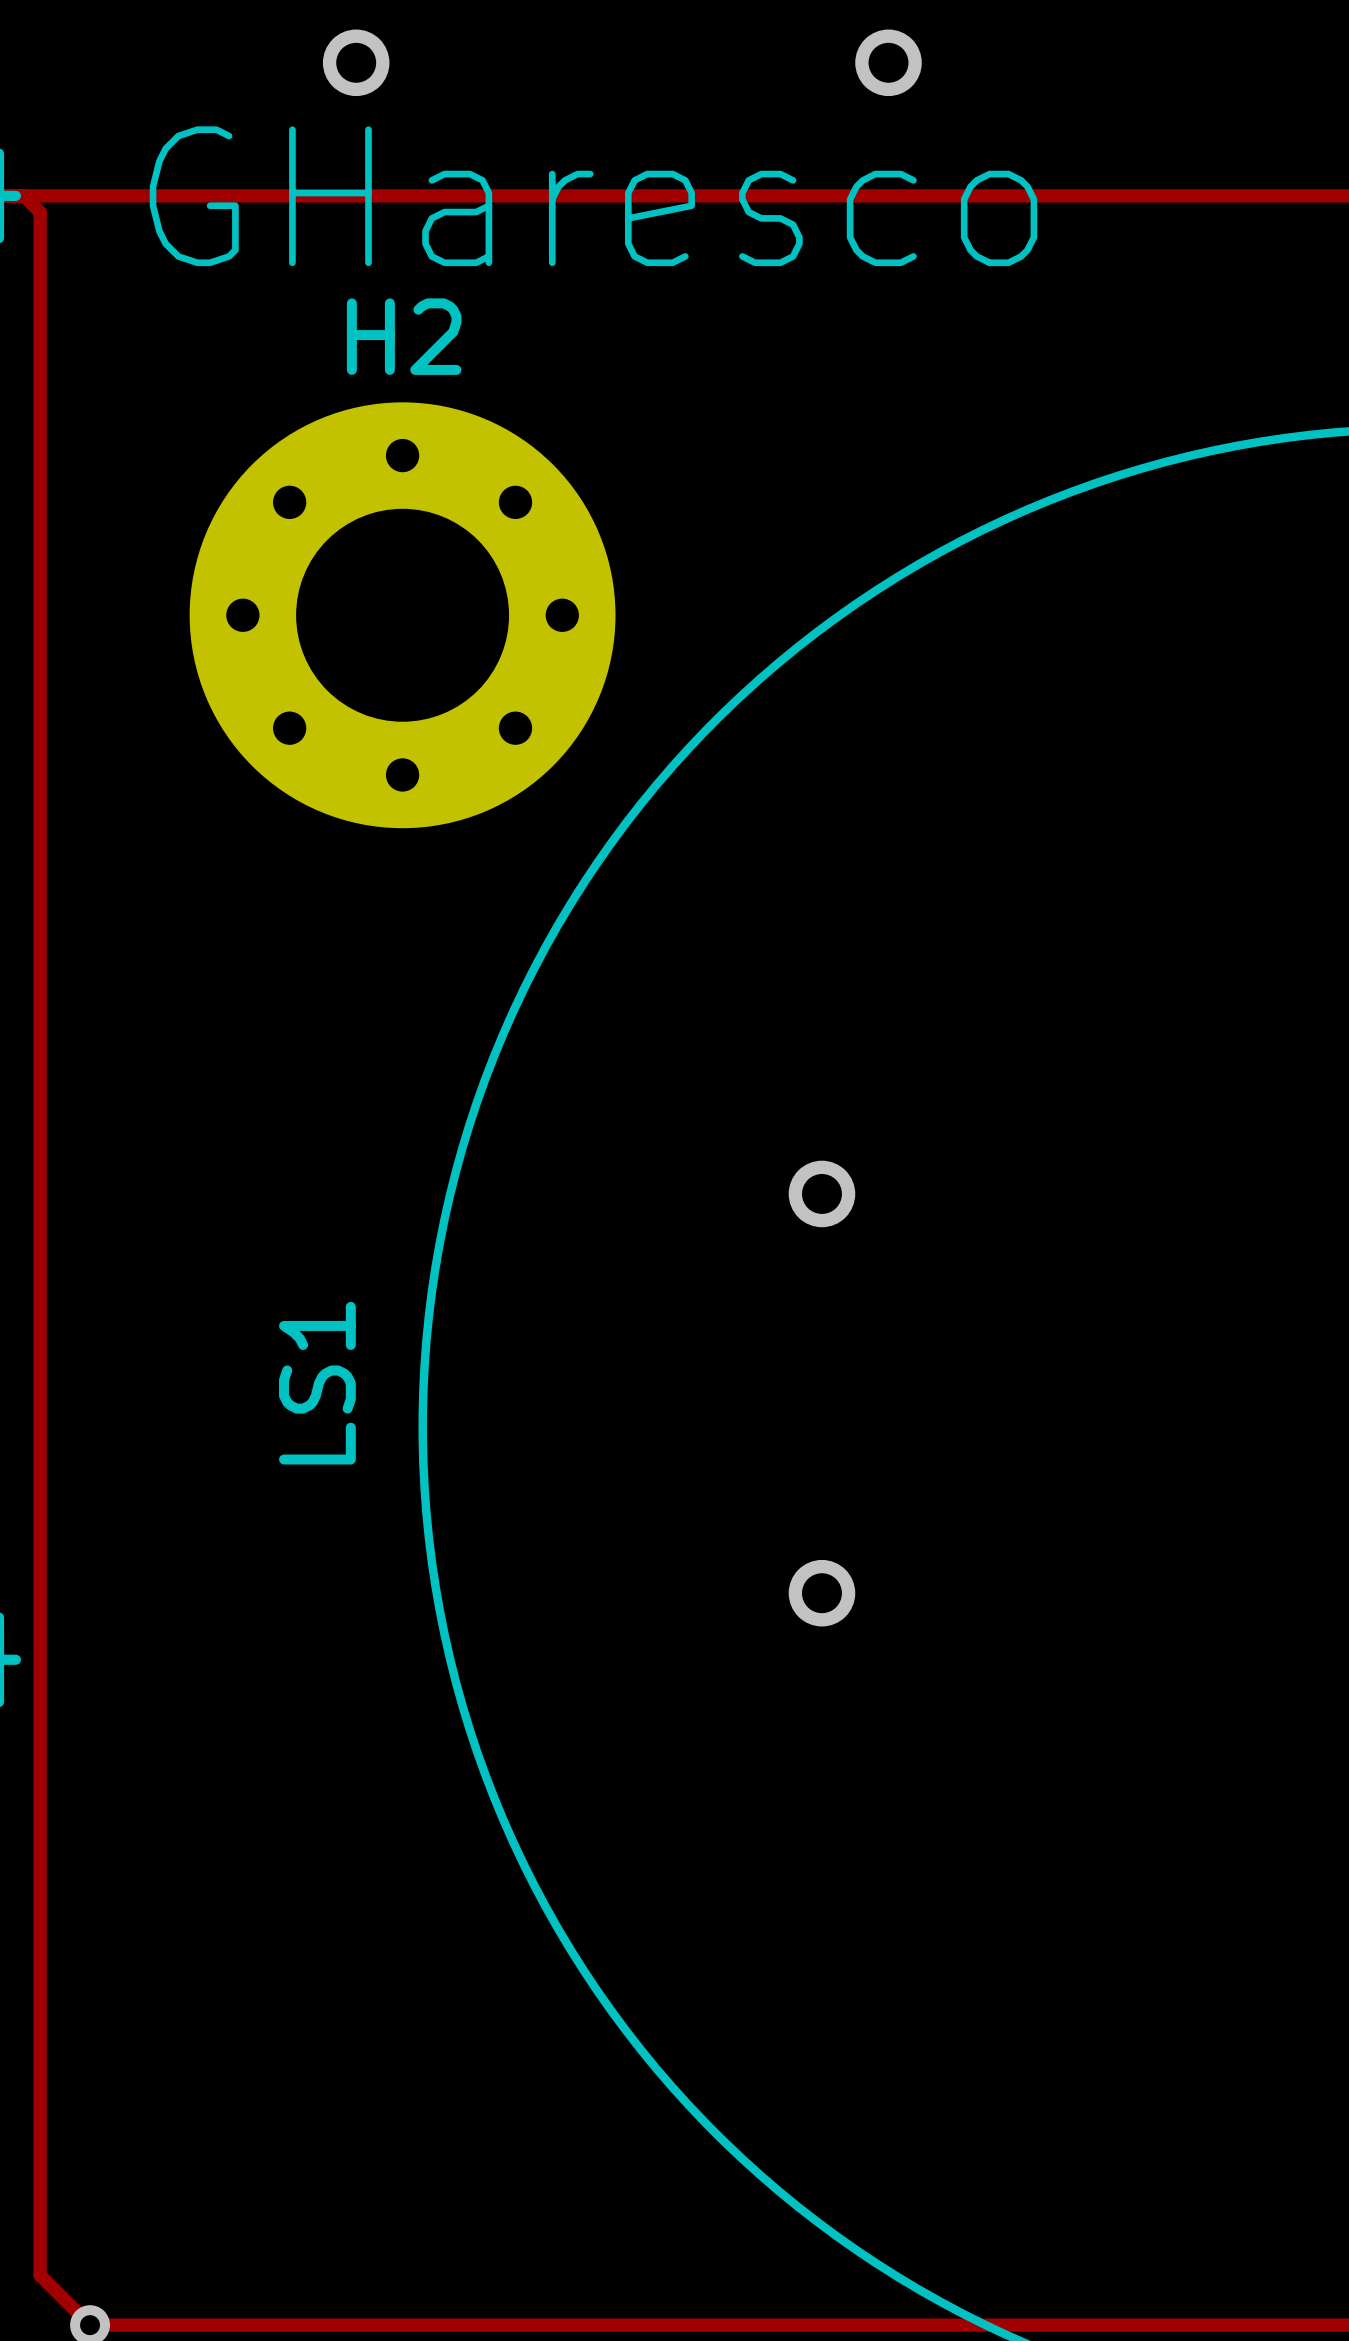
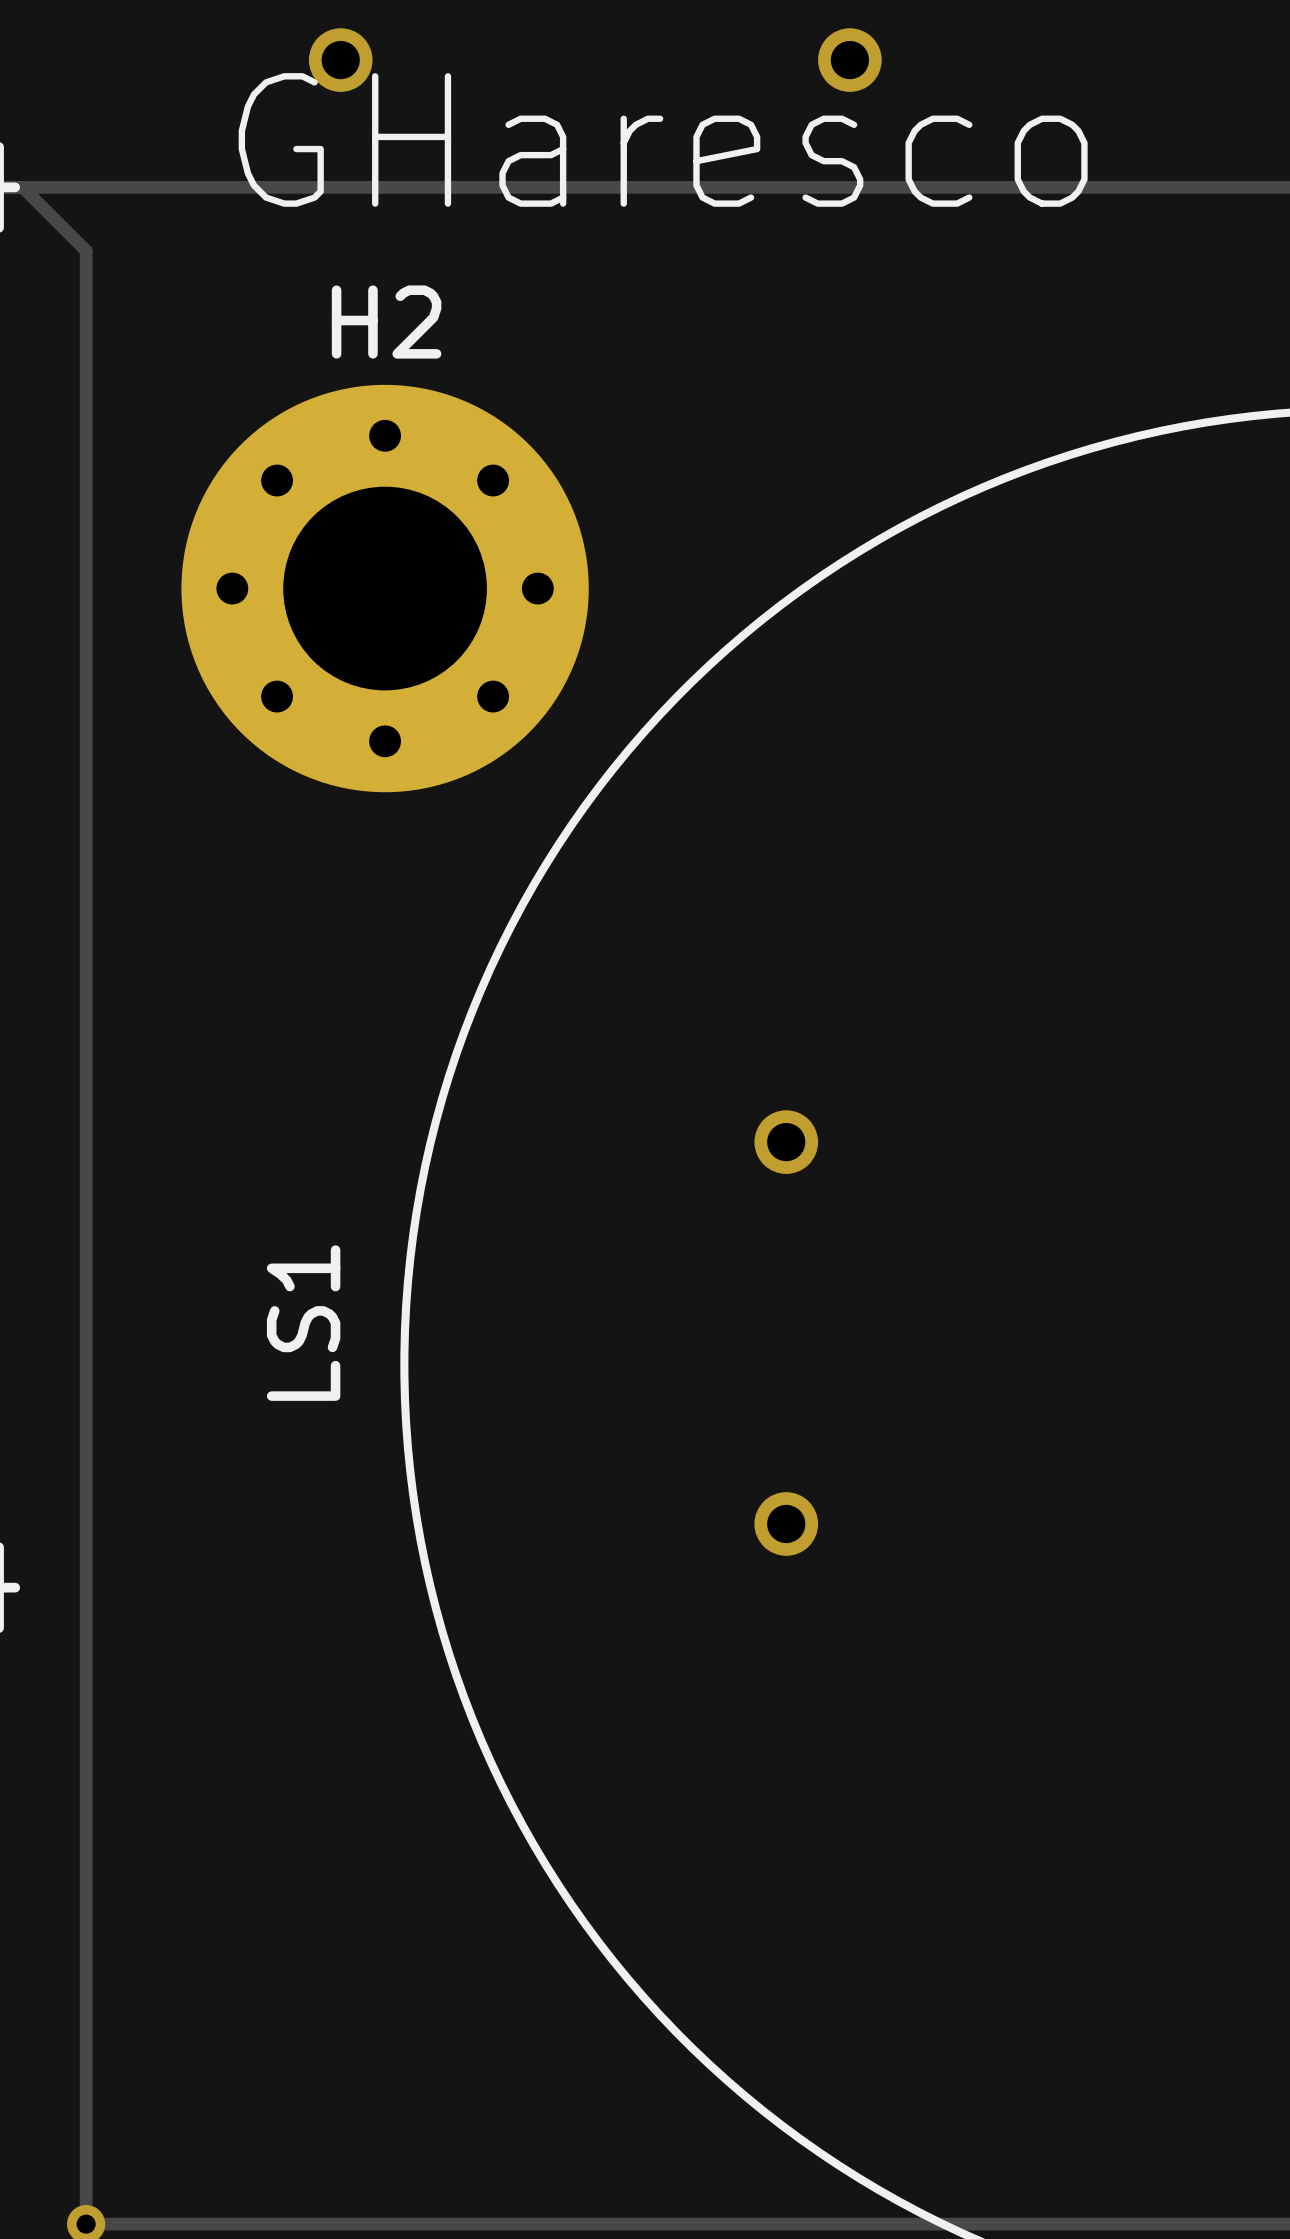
text position: GHaresco (593, 196) -> GHaresco (663, 139)
track: (40, 212) (40, 2275) (90, 2325) -> (38, 203) (86, 250) (86, 2224)

